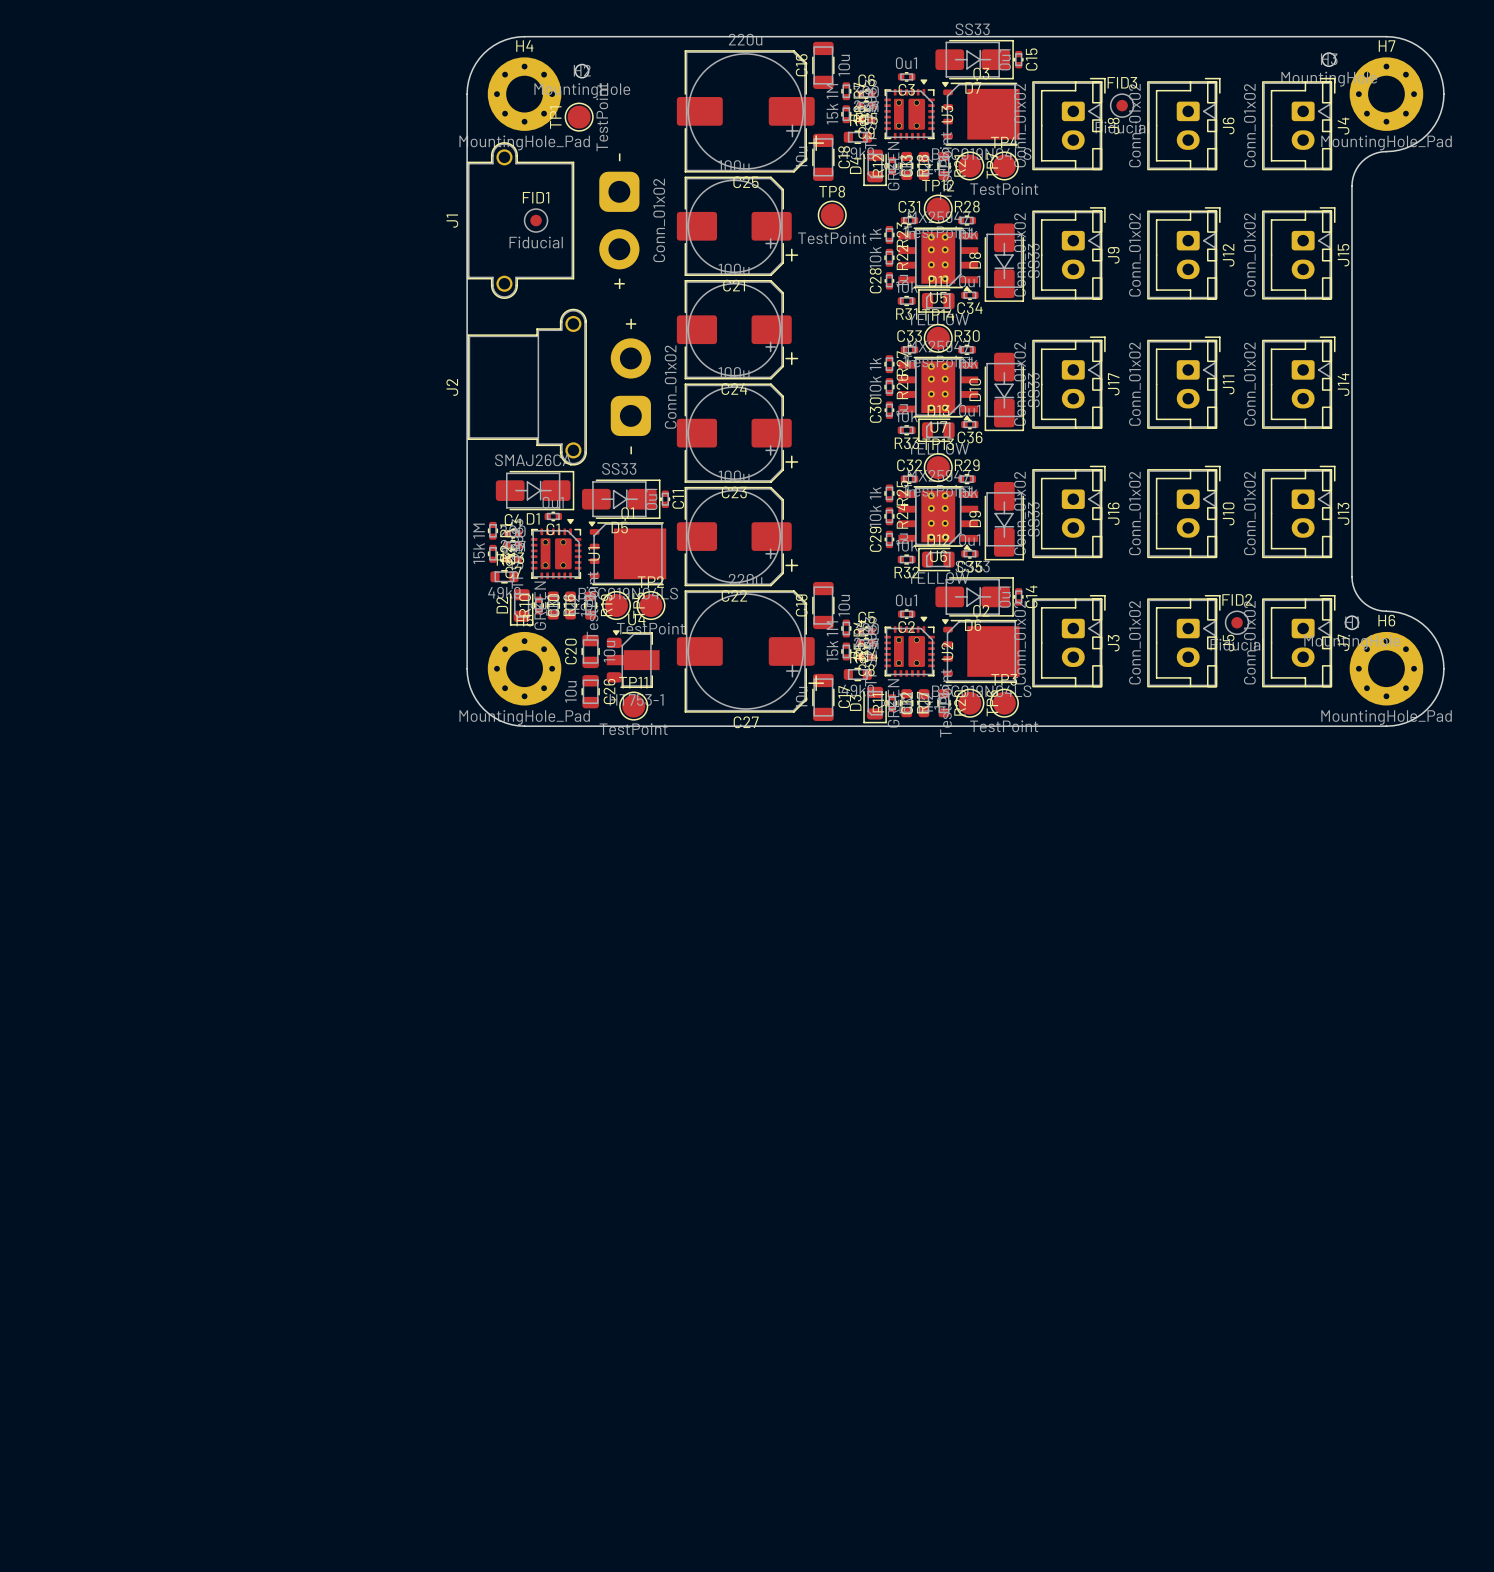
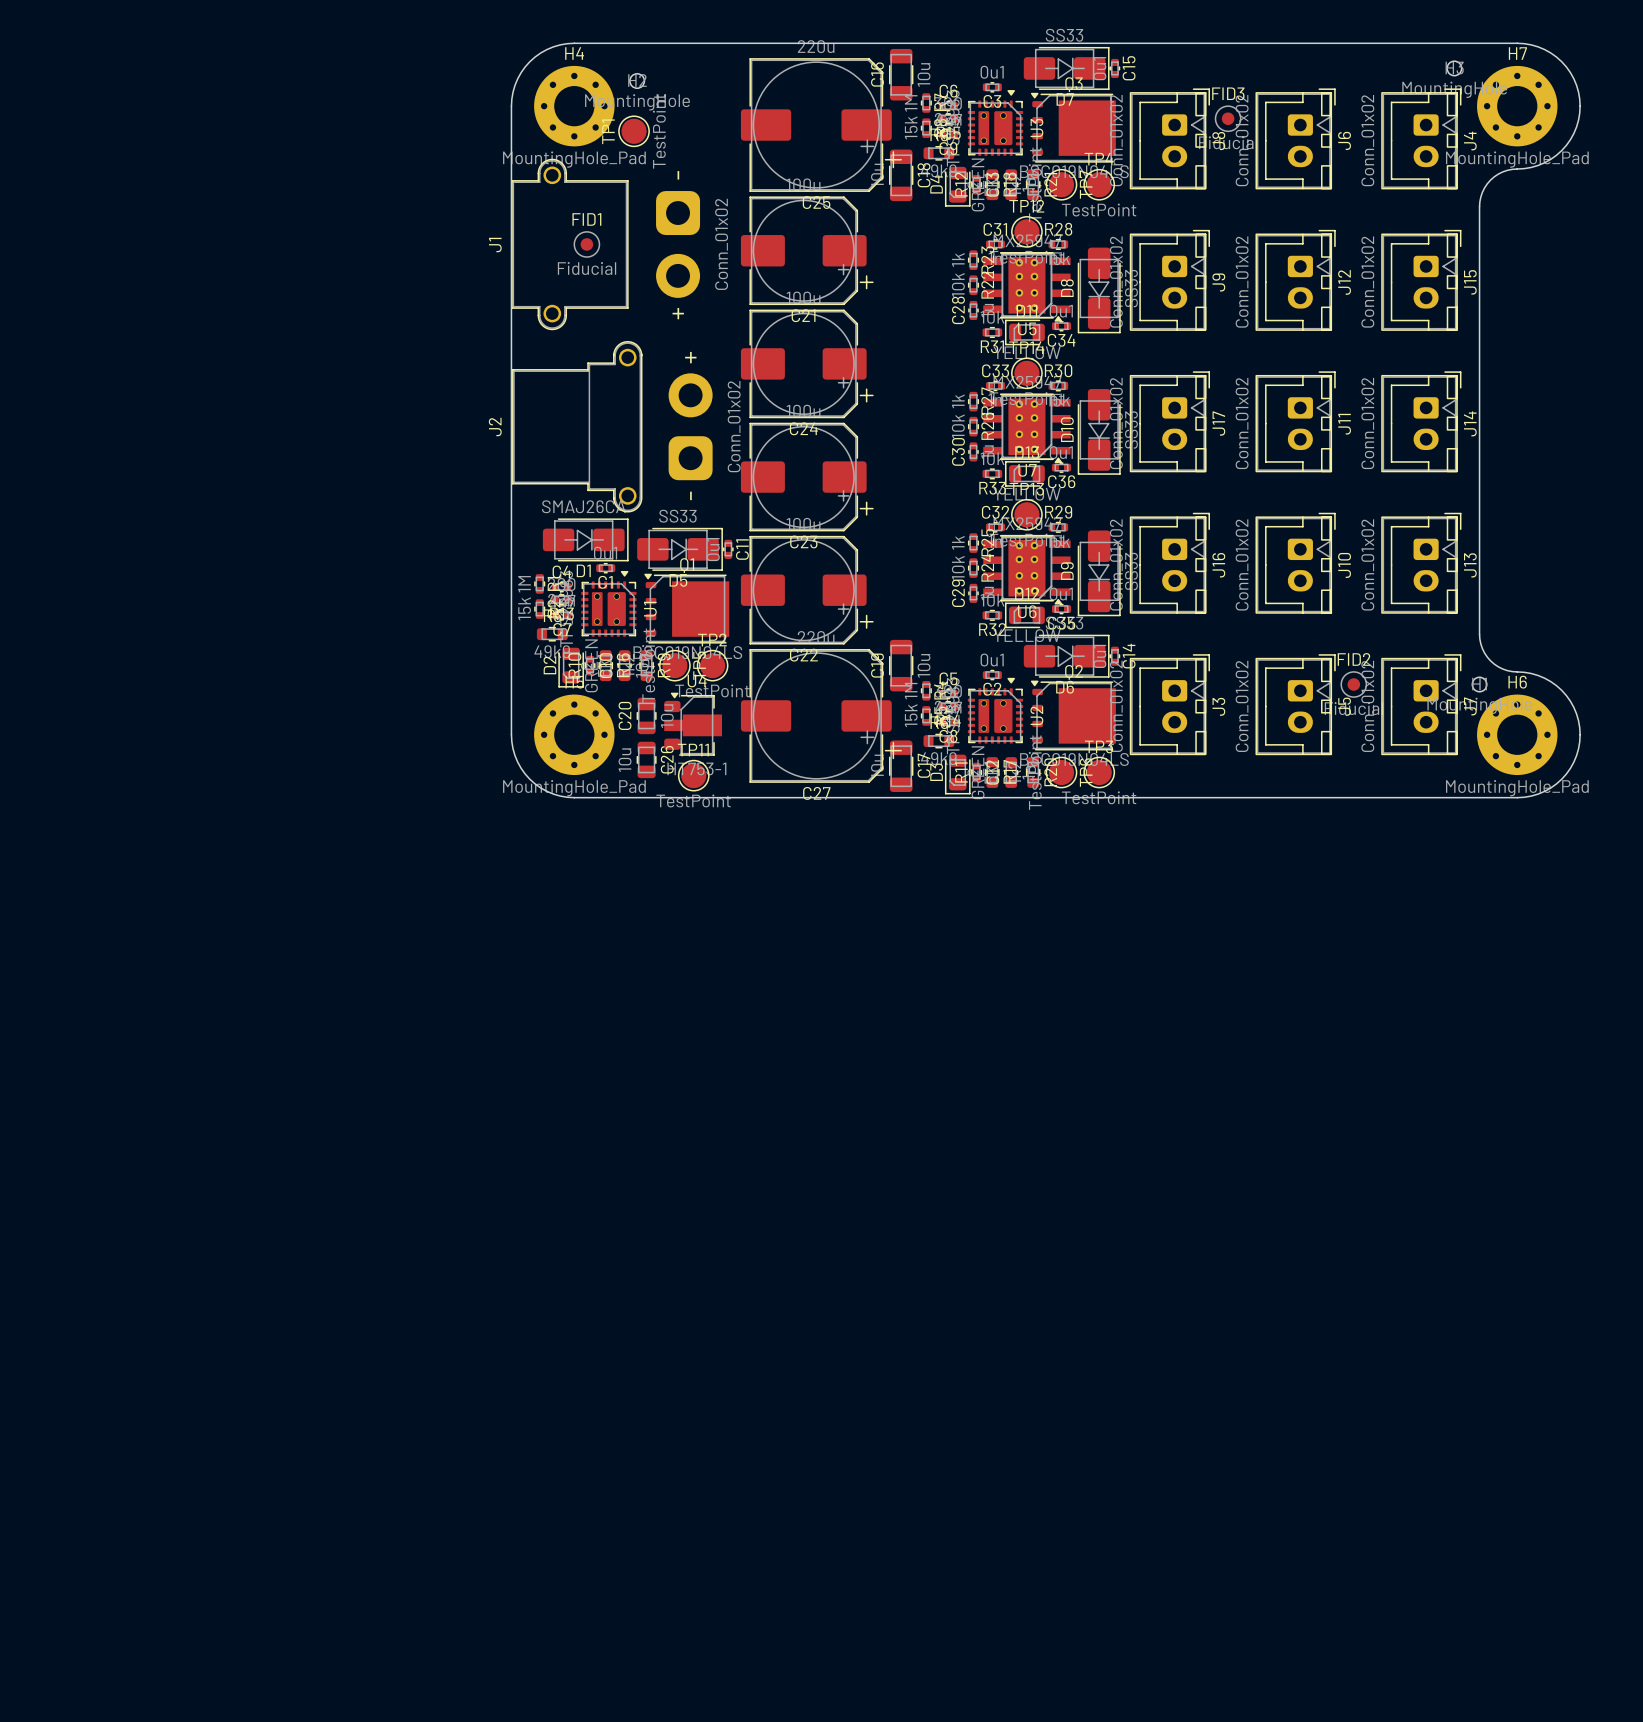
TP8: TestPoint (832, 215) -> none

